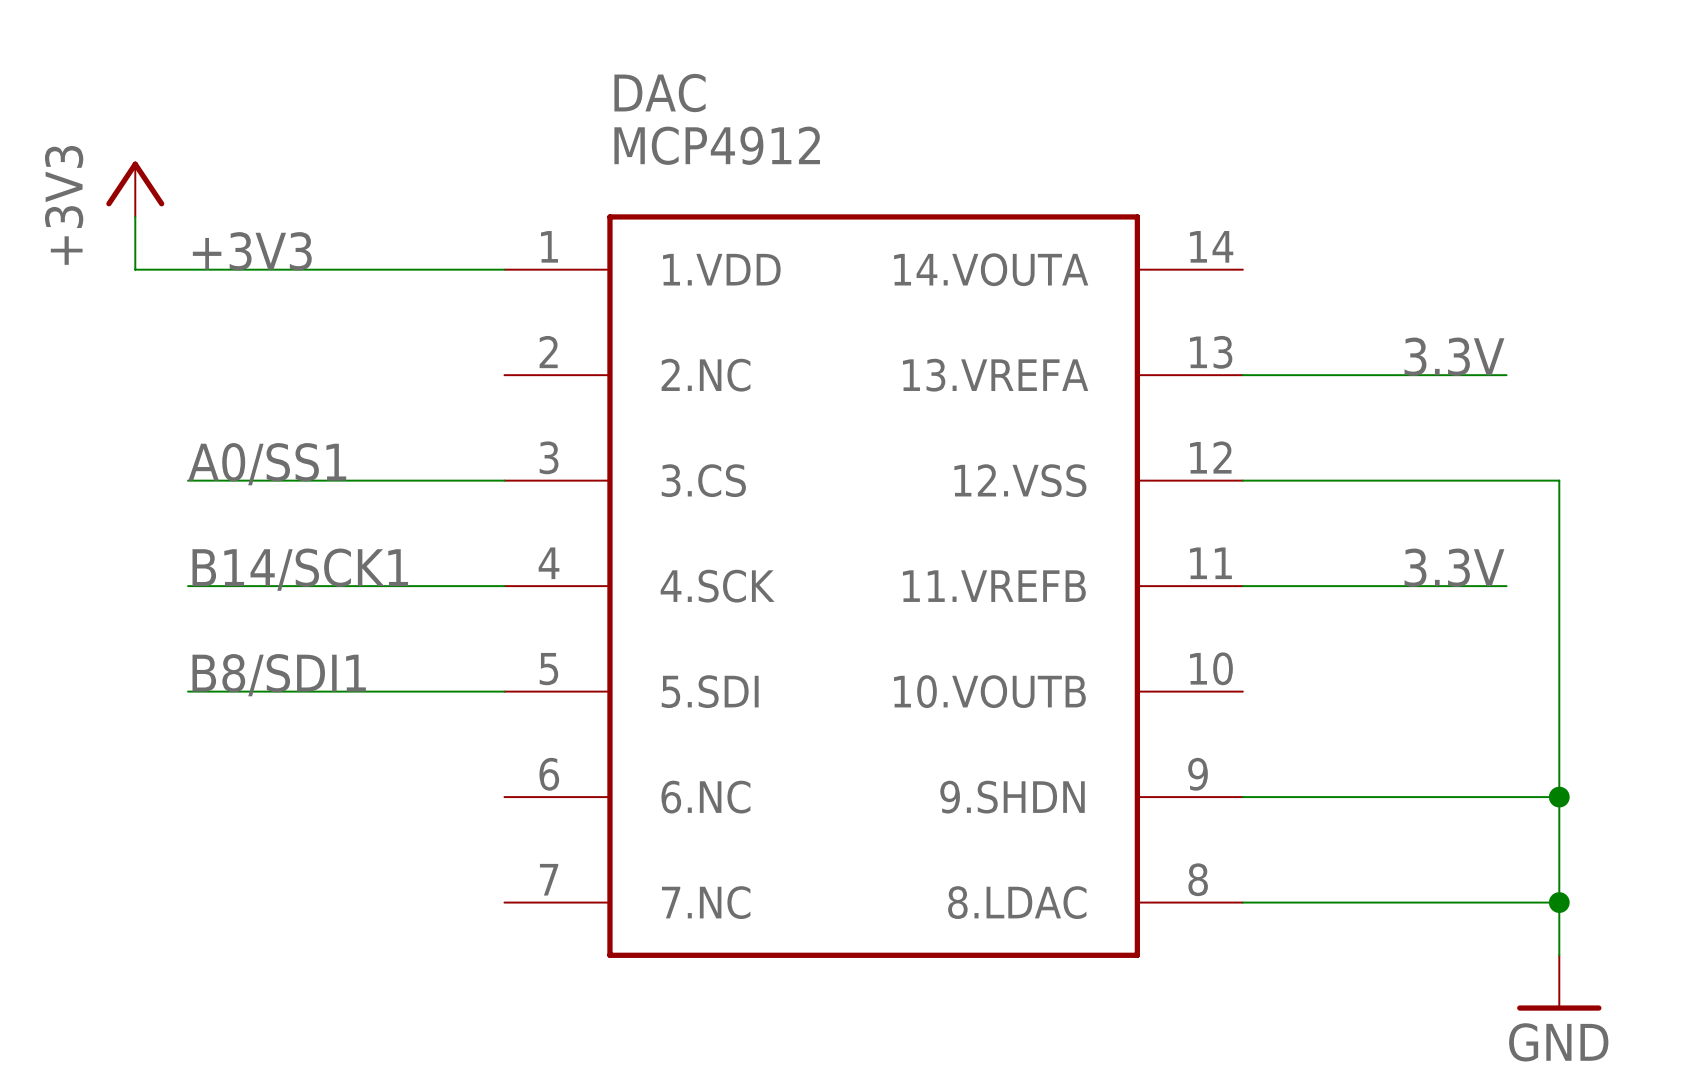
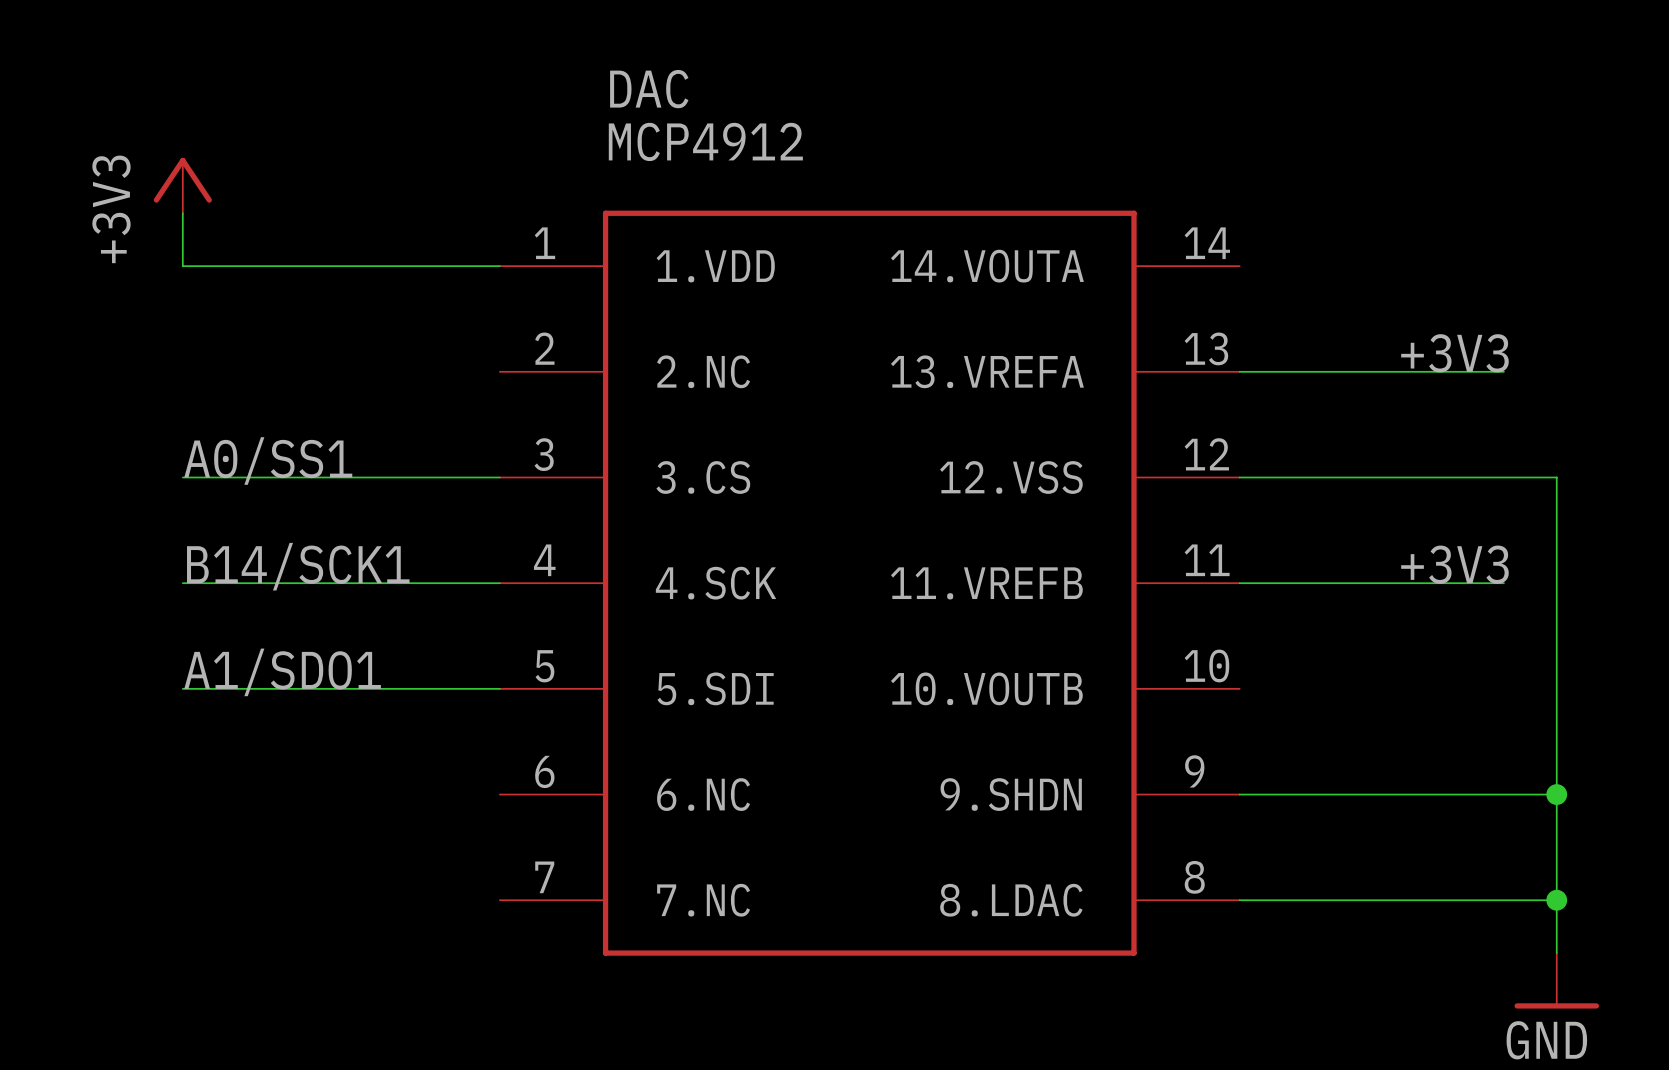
power symbol position: +3V3 (135, 189) -> +3V3 (182, 185)
wire: (135, 216) (135, 269) (188, 269) -> (182, 213) (182, 266)
label: +3V3 (252, 251) -> none
label: 3.3V (1454, 356) -> +3V3 (1454, 353)
label: 3.3V (1454, 567) -> +3V3 (1454, 564)
label: B8/SDI1 (279, 675) -> A1/SDO1 (282, 672)

